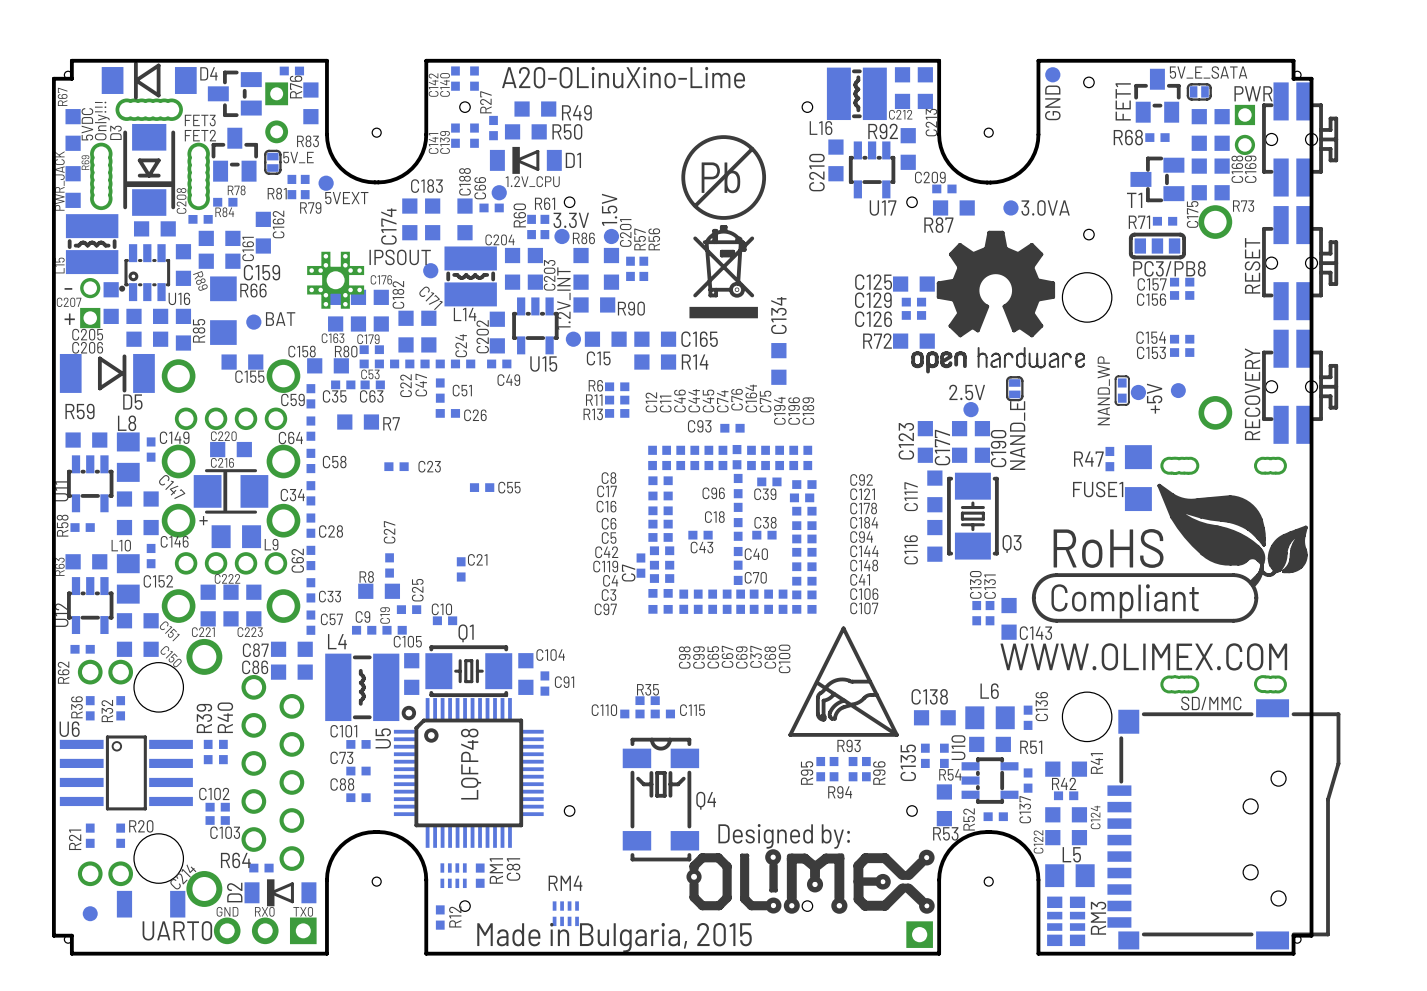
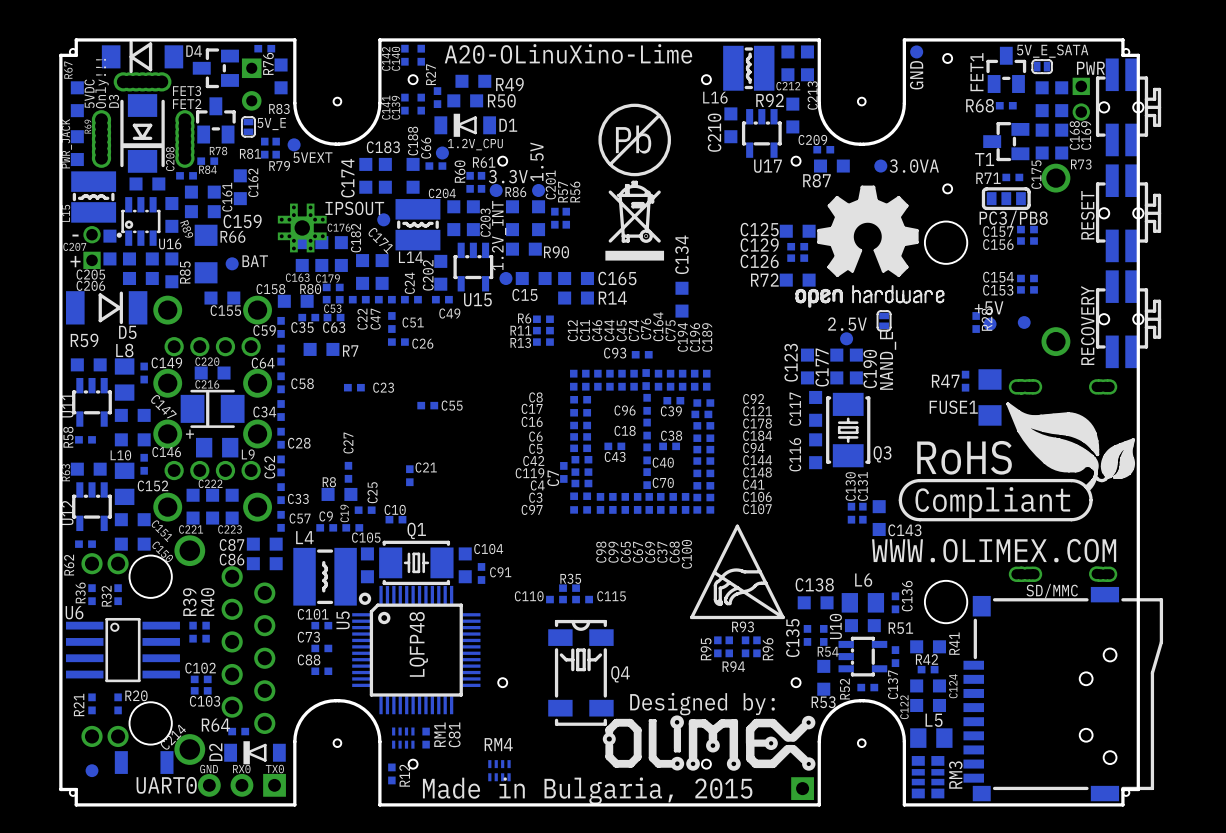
line: (1126, 376) (1117, 376) (1115, 378) (1115, 402) (1117, 404) (1126, 404) (1128, 402) (1128, 378) (1126, 376) -> none
NAND_WP name: NAND_WP (1103, 390) -> R28 (987, 319)
+5V name rotation: 0° (1154, 398) -> 90° clockwise (989, 307)

